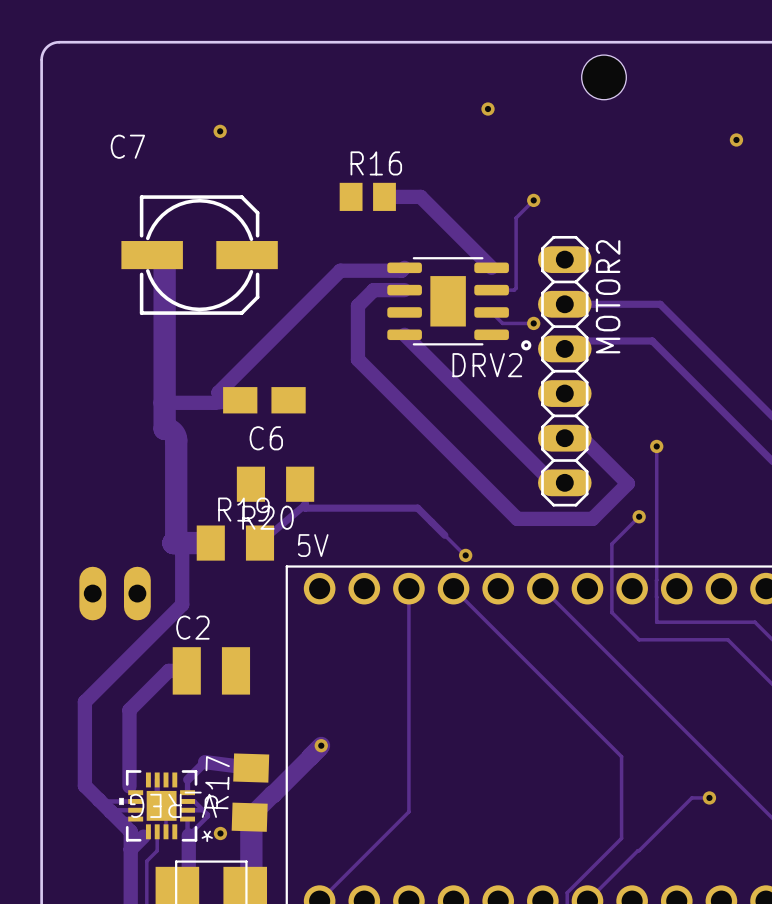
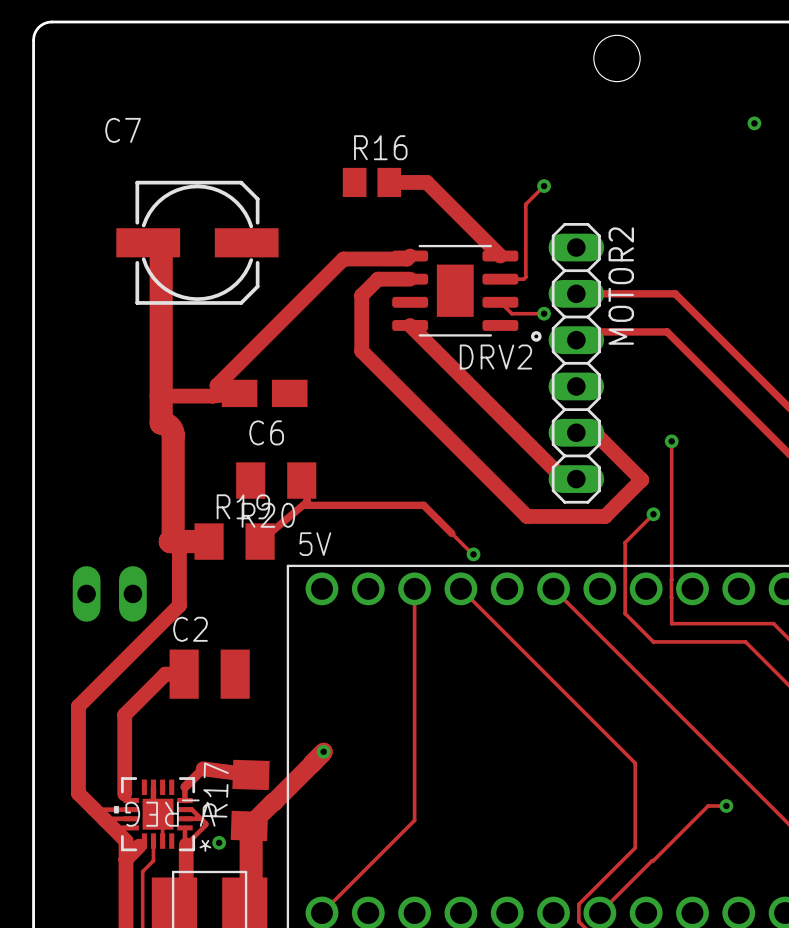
via: (488, 109) -> none
via: (220, 131) -> none

